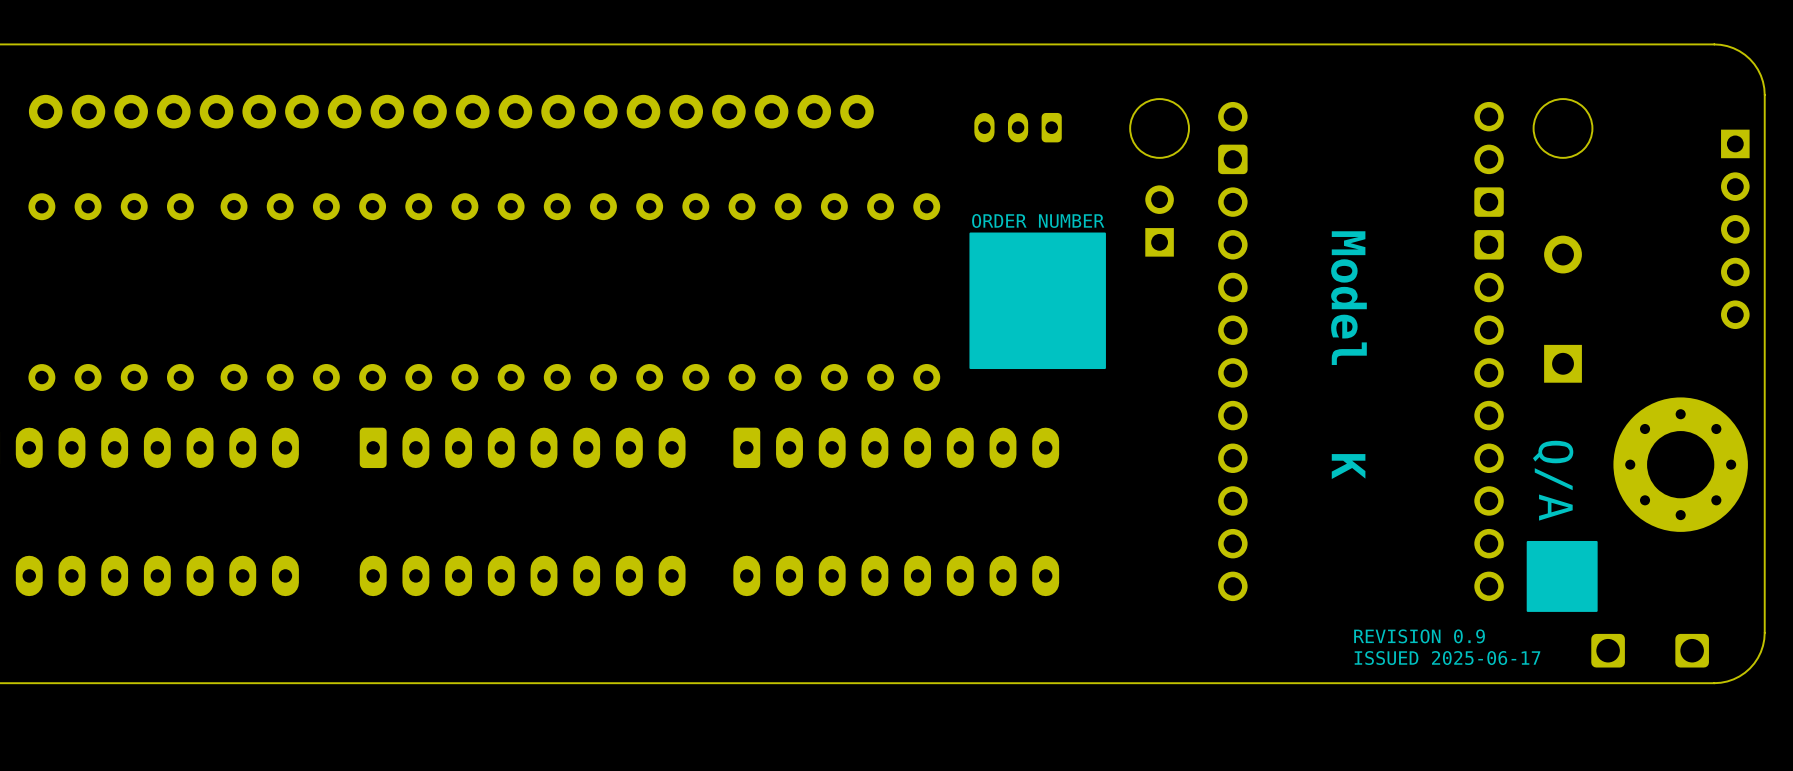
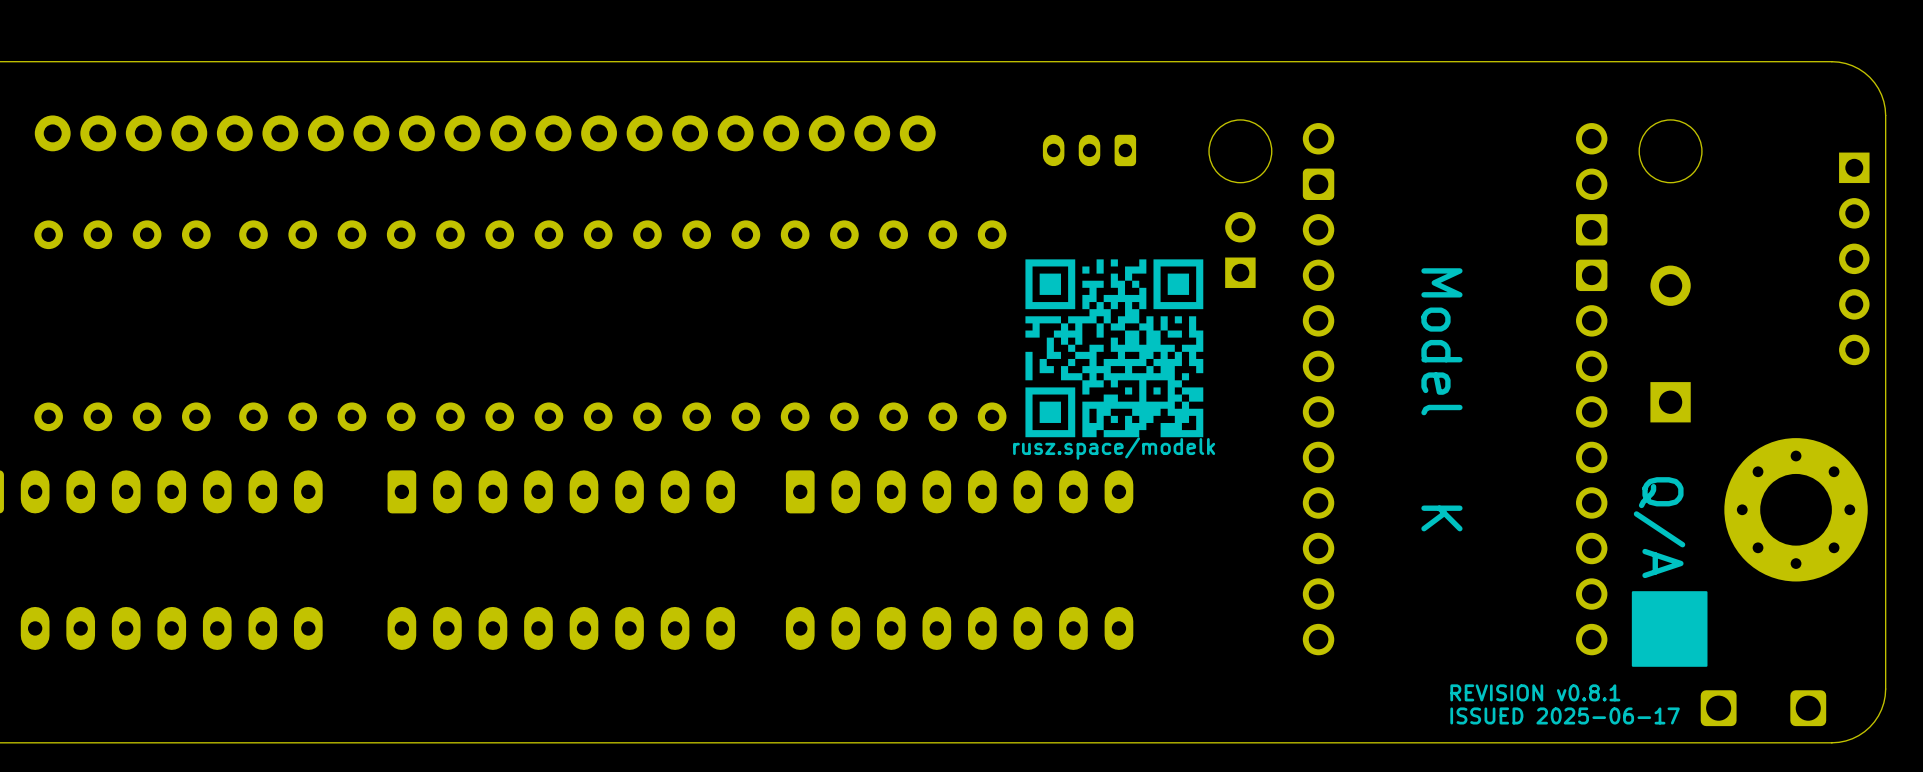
text: ORDER NUMBER (1038, 220) -> none
drawing shape: [969, 232, 1106, 370] -> [1025, 259, 1204, 438]
text: none -> rusz.space/modelk (1114, 448)
text: REVISION 0.9 (1419, 636) -> REVISION v0.8.1 (1535, 692)

